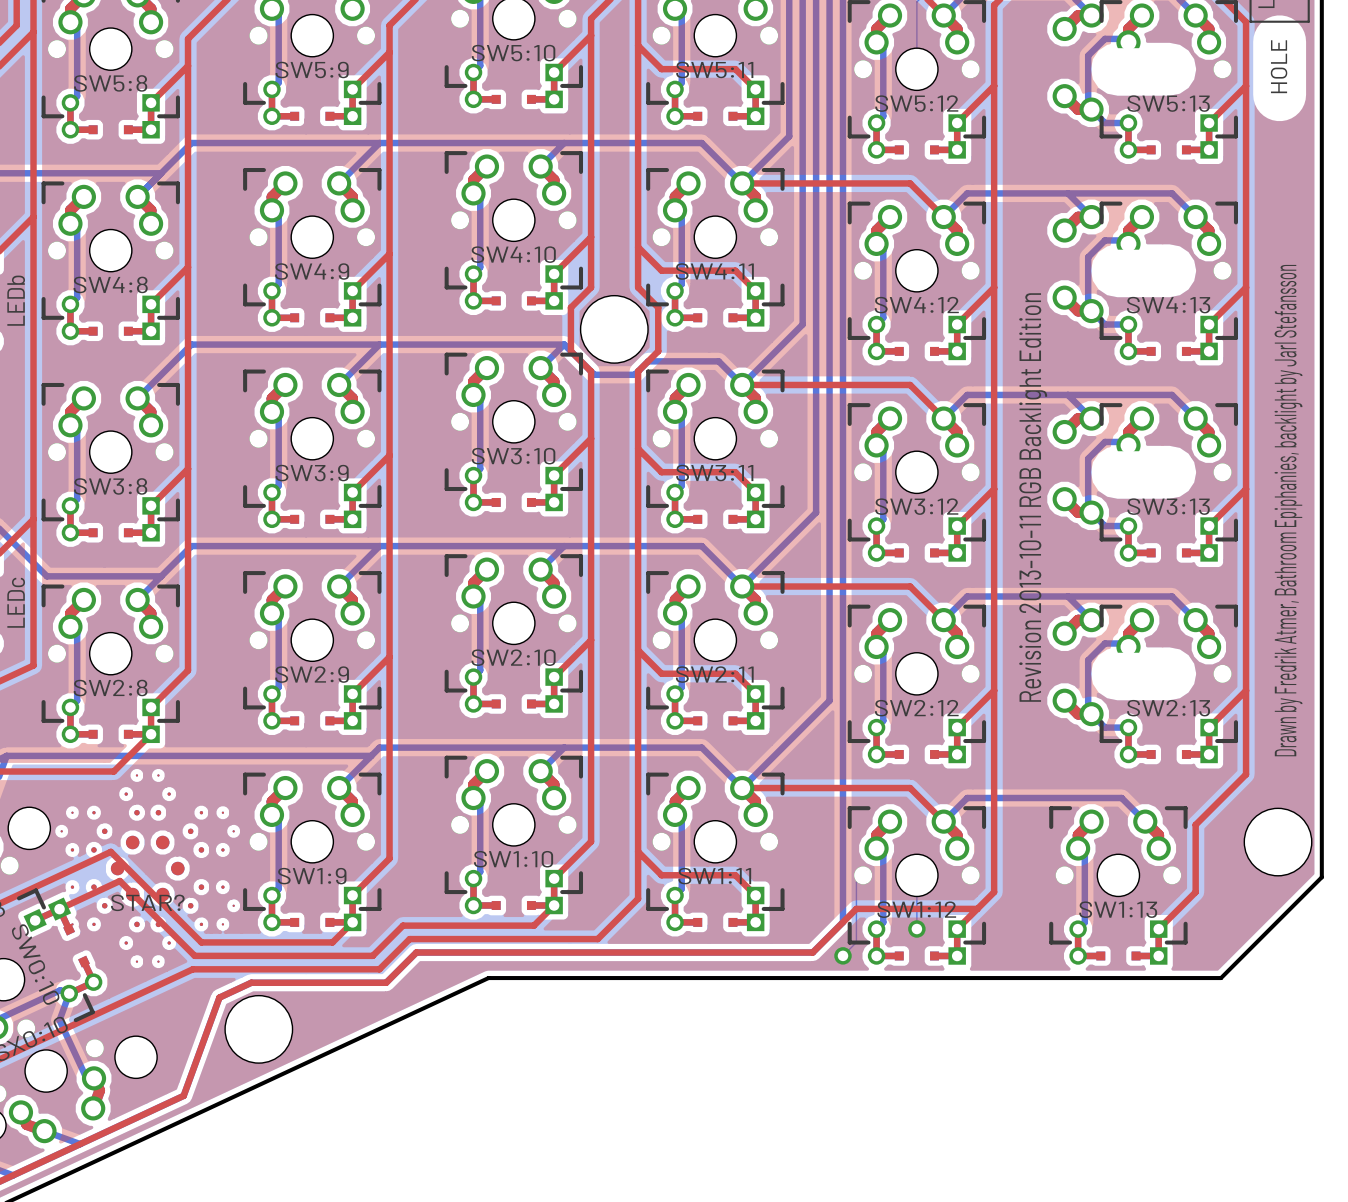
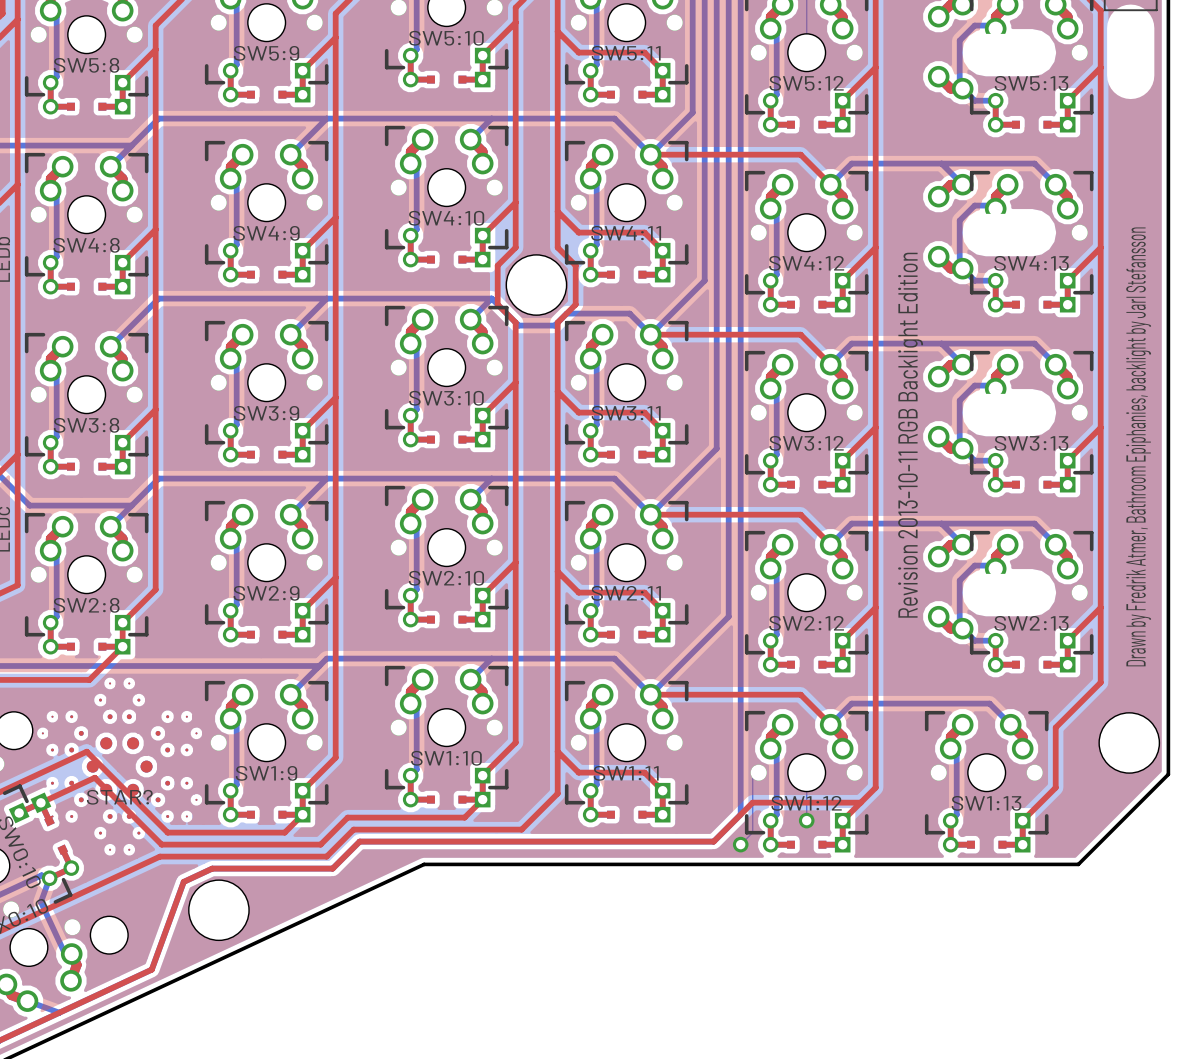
part text: HOLE (1279, 66) -> none

